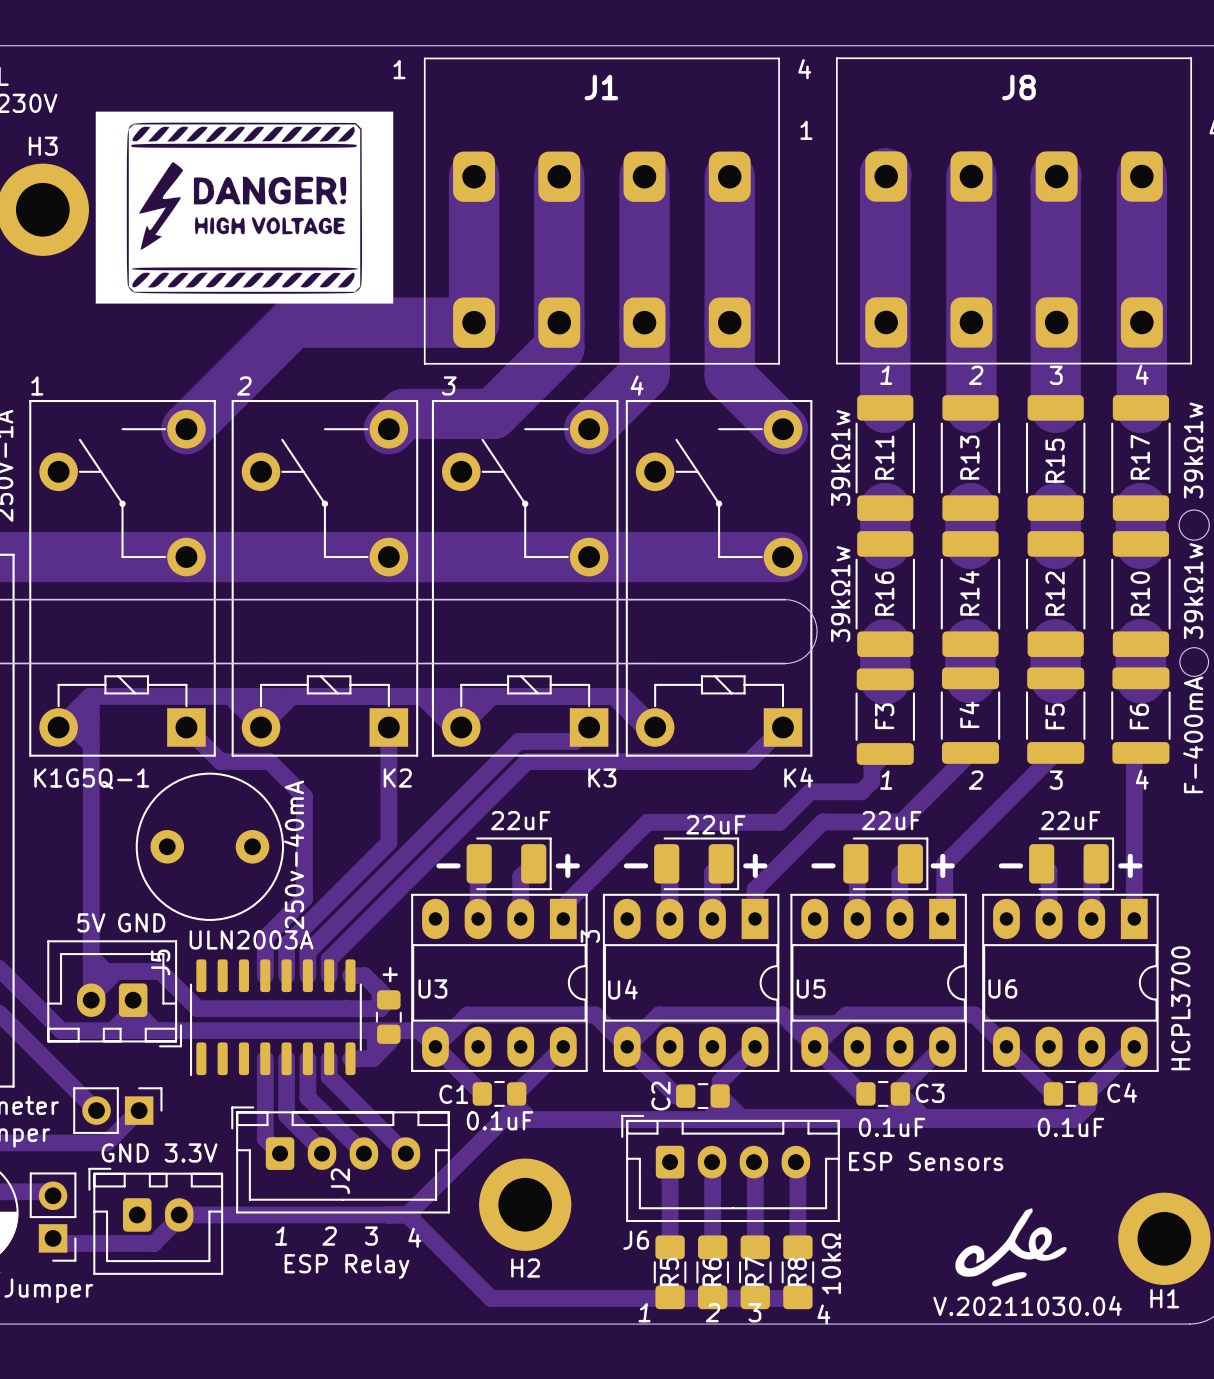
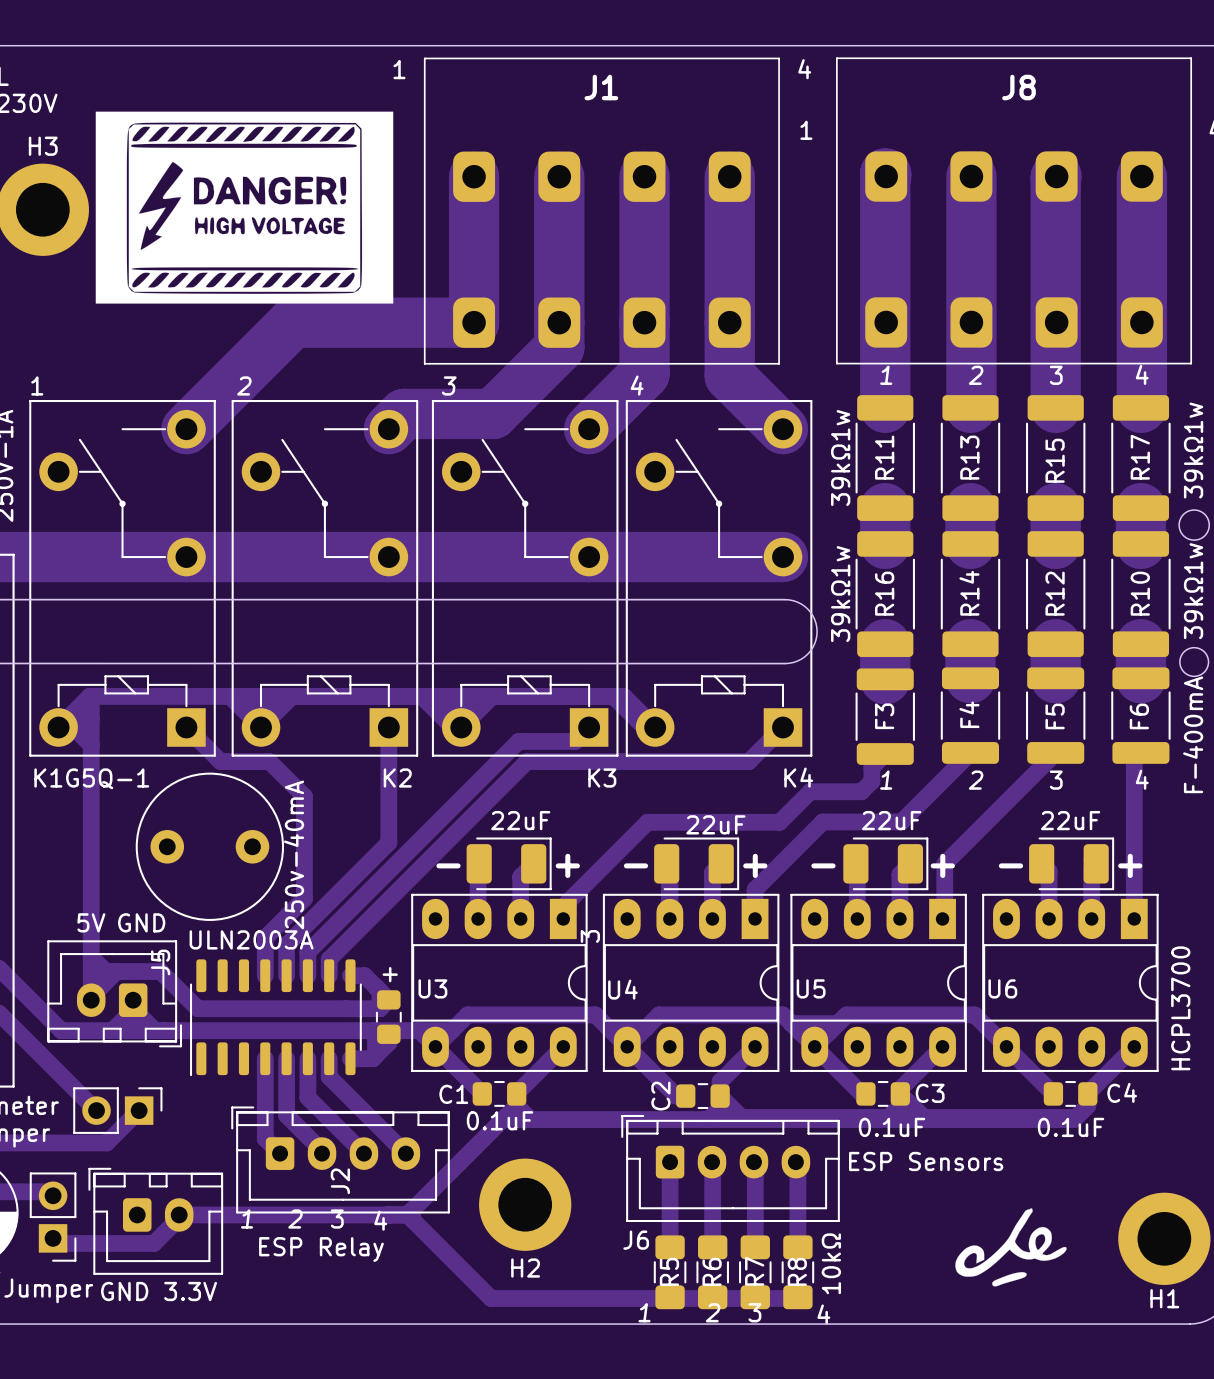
part value position: GND 3.3V (159, 1152) -> GND 3.3V (159, 1291)
text position: 1 (281, 1236) -> 1 (247, 1219)
text position: 2 (329, 1236) -> 2 (295, 1219)
text position: 3 (371, 1236) -> 3 (337, 1219)
text position: 4 (414, 1237) -> 4 (380, 1220)
text position: ESP Relay (347, 1266) -> ESP Relay (321, 1249)
text: V.20211030.04 (1027, 1305) -> none

